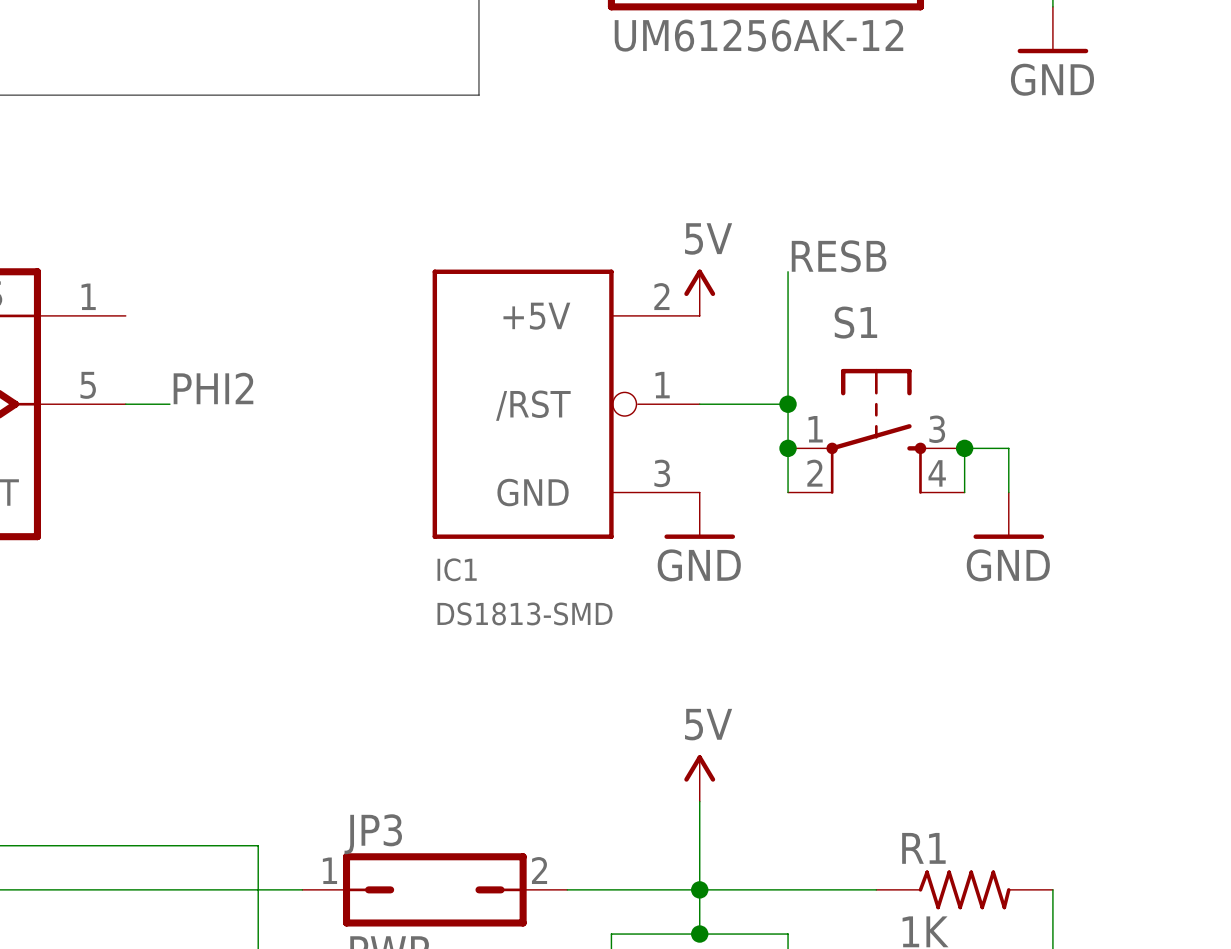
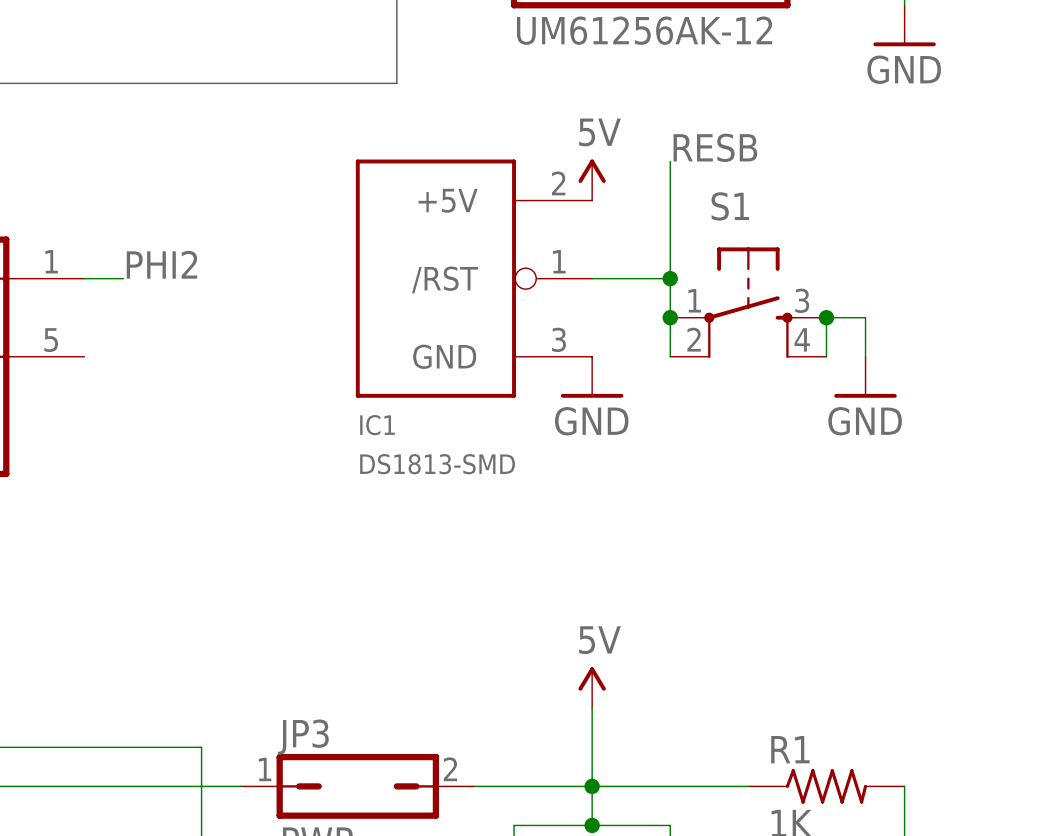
wire: none -> (670, 161) (670, 239)
label position: RESB (839, 256) -> RESB (715, 147)
power symbol position: 5V (699, 292) -> 5V (592, 180)
wire: none -> (592, 278) (670, 278)
junction: none -> (670, 278)
junction: none -> (670, 317)
label position: PHI2 (213, 388) -> PHI2 (162, 264)
wire: (125, 404) (169, 404) -> (84, 278) (123, 278)
IC1 position: (566, 404) -> (473, 278)
wire: (699, 404) (788, 404) (788, 492) -> none
junction: (788, 404) -> none
S1 position: (876, 431) -> (748, 302)
junction: (788, 448) -> none
junction position: (964, 448) -> (826, 317)
wire: (964, 492) (964, 448) (1008, 448) (1008, 492) -> (826, 356) (826, 317) (865, 317) (865, 356)
power symbol position: GND (699, 515) -> GND (592, 377)
power symbol position: GND (1008, 515) -> GND (865, 377)

